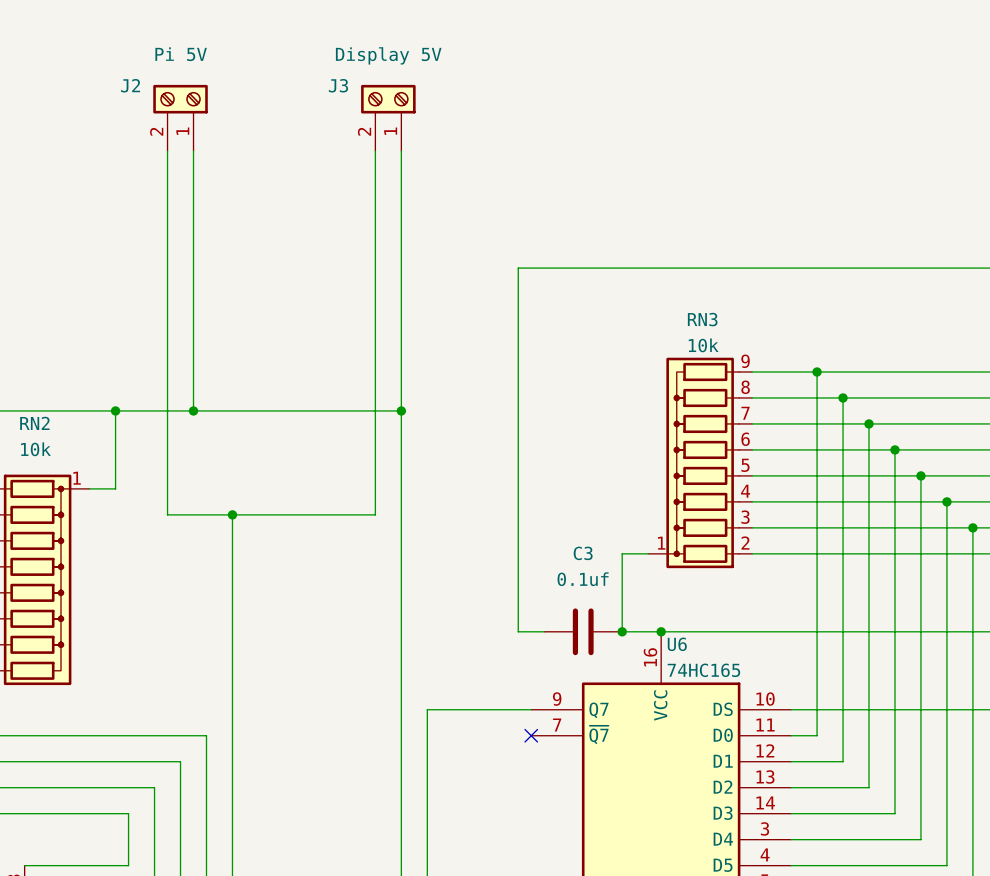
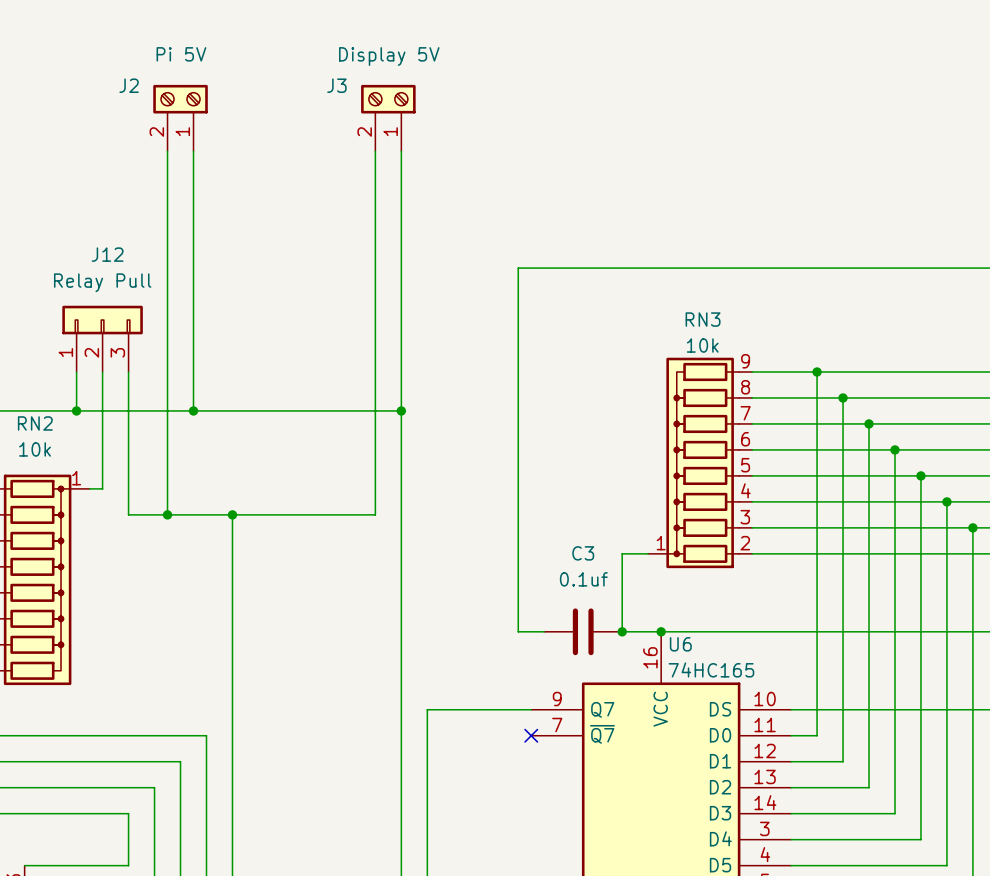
J12: none -> Relay Pull (102, 338)
wire: none -> (76, 372) (76, 410)
wire: none -> (128, 372) (128, 514) (167, 514)
wire: (115, 410) (115, 488) (102, 488) -> (102, 372) (102, 488)
junction position: (115, 410) -> (76, 410)
junction: none -> (167, 514)

